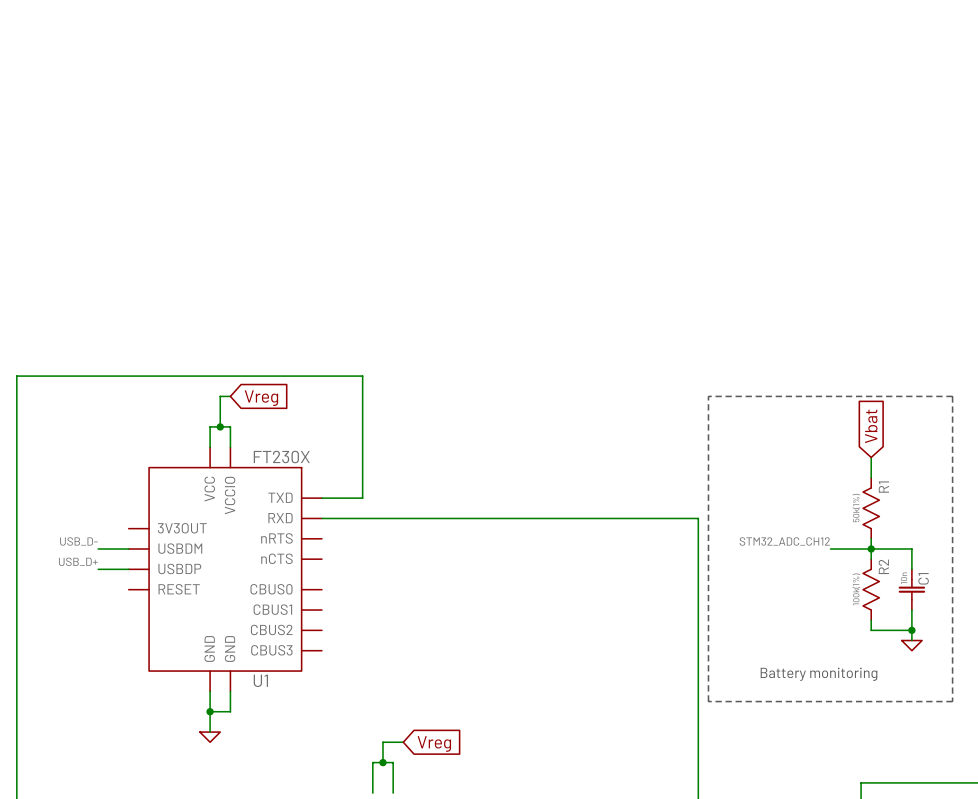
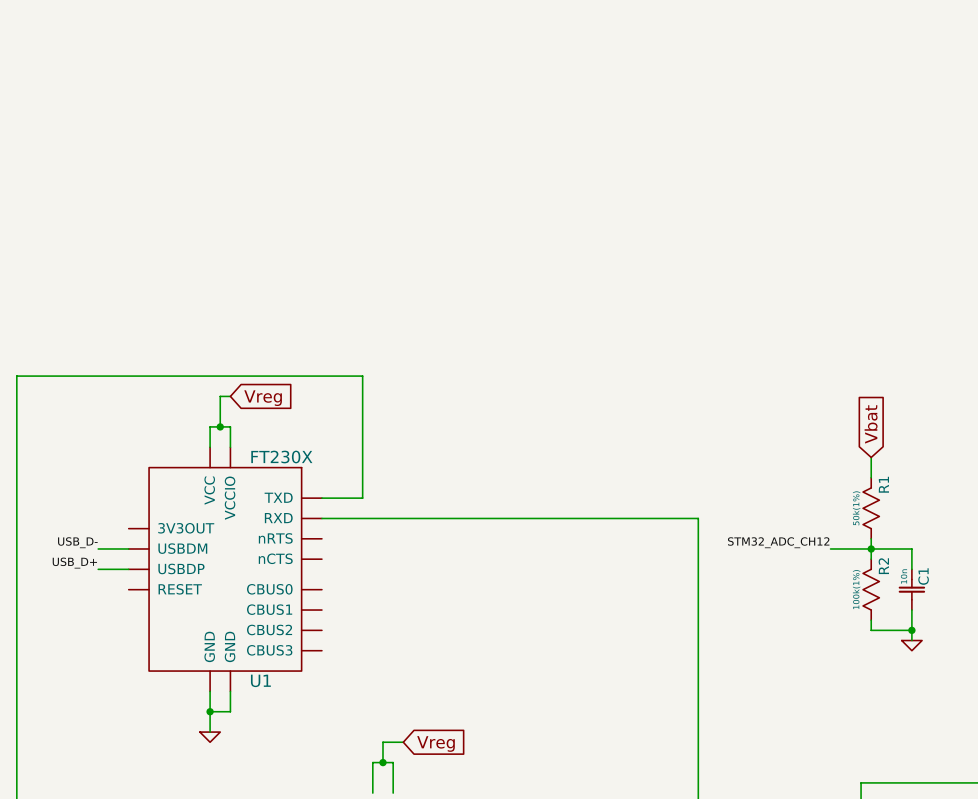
line: (708, 396) (952, 396) (952, 701) (708, 701) (708, 396) -> none
text: Battery monitoring (819, 674) -> none

